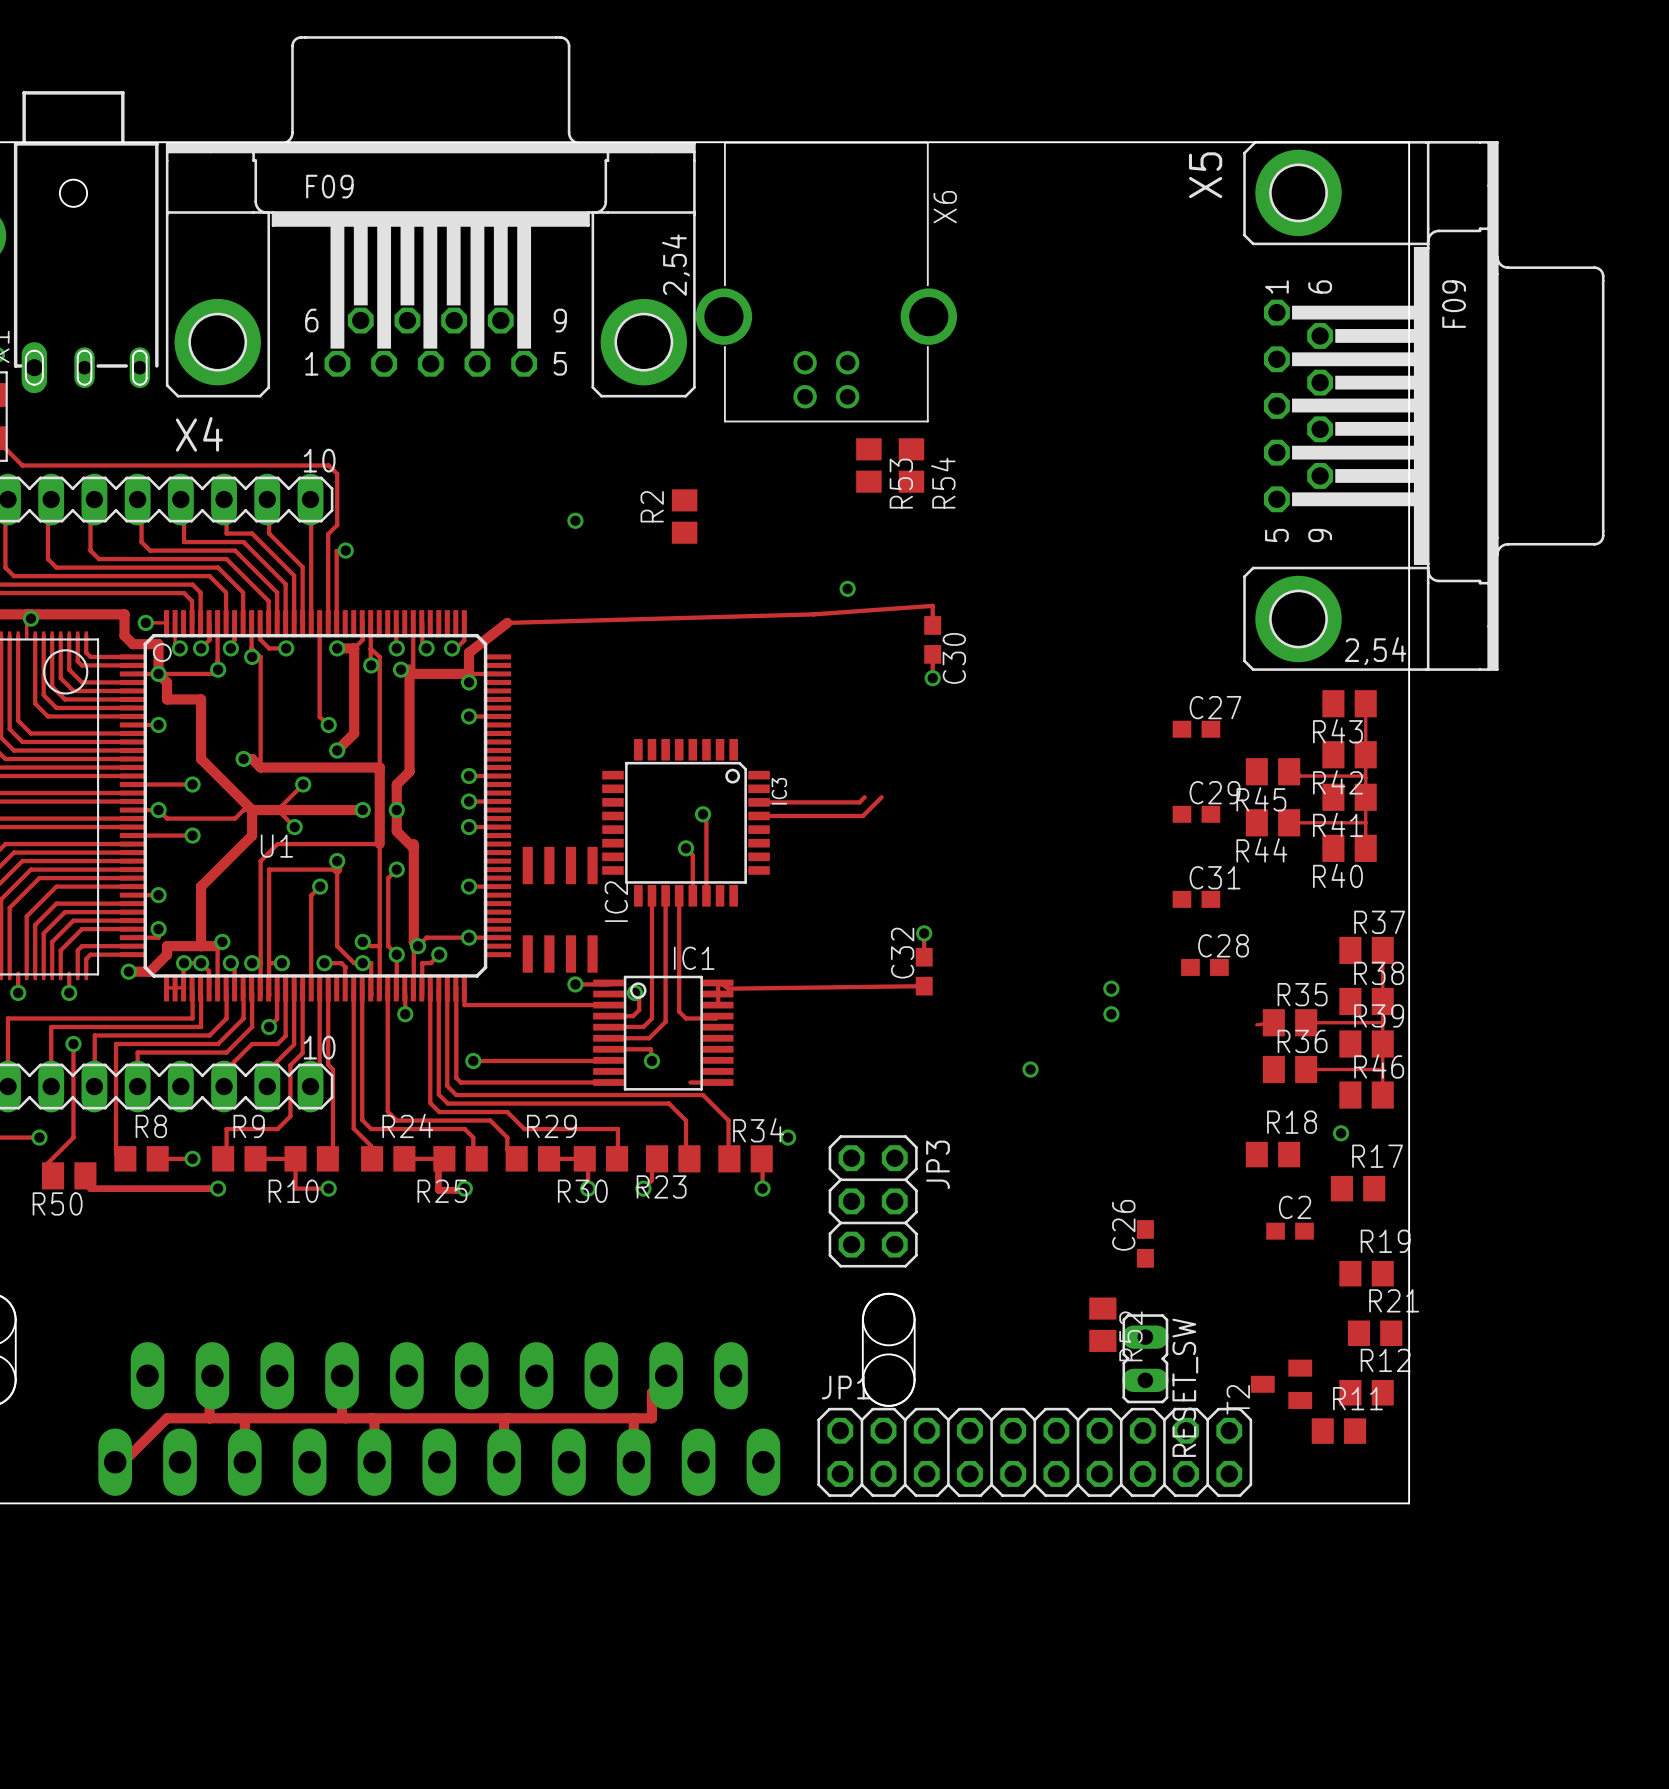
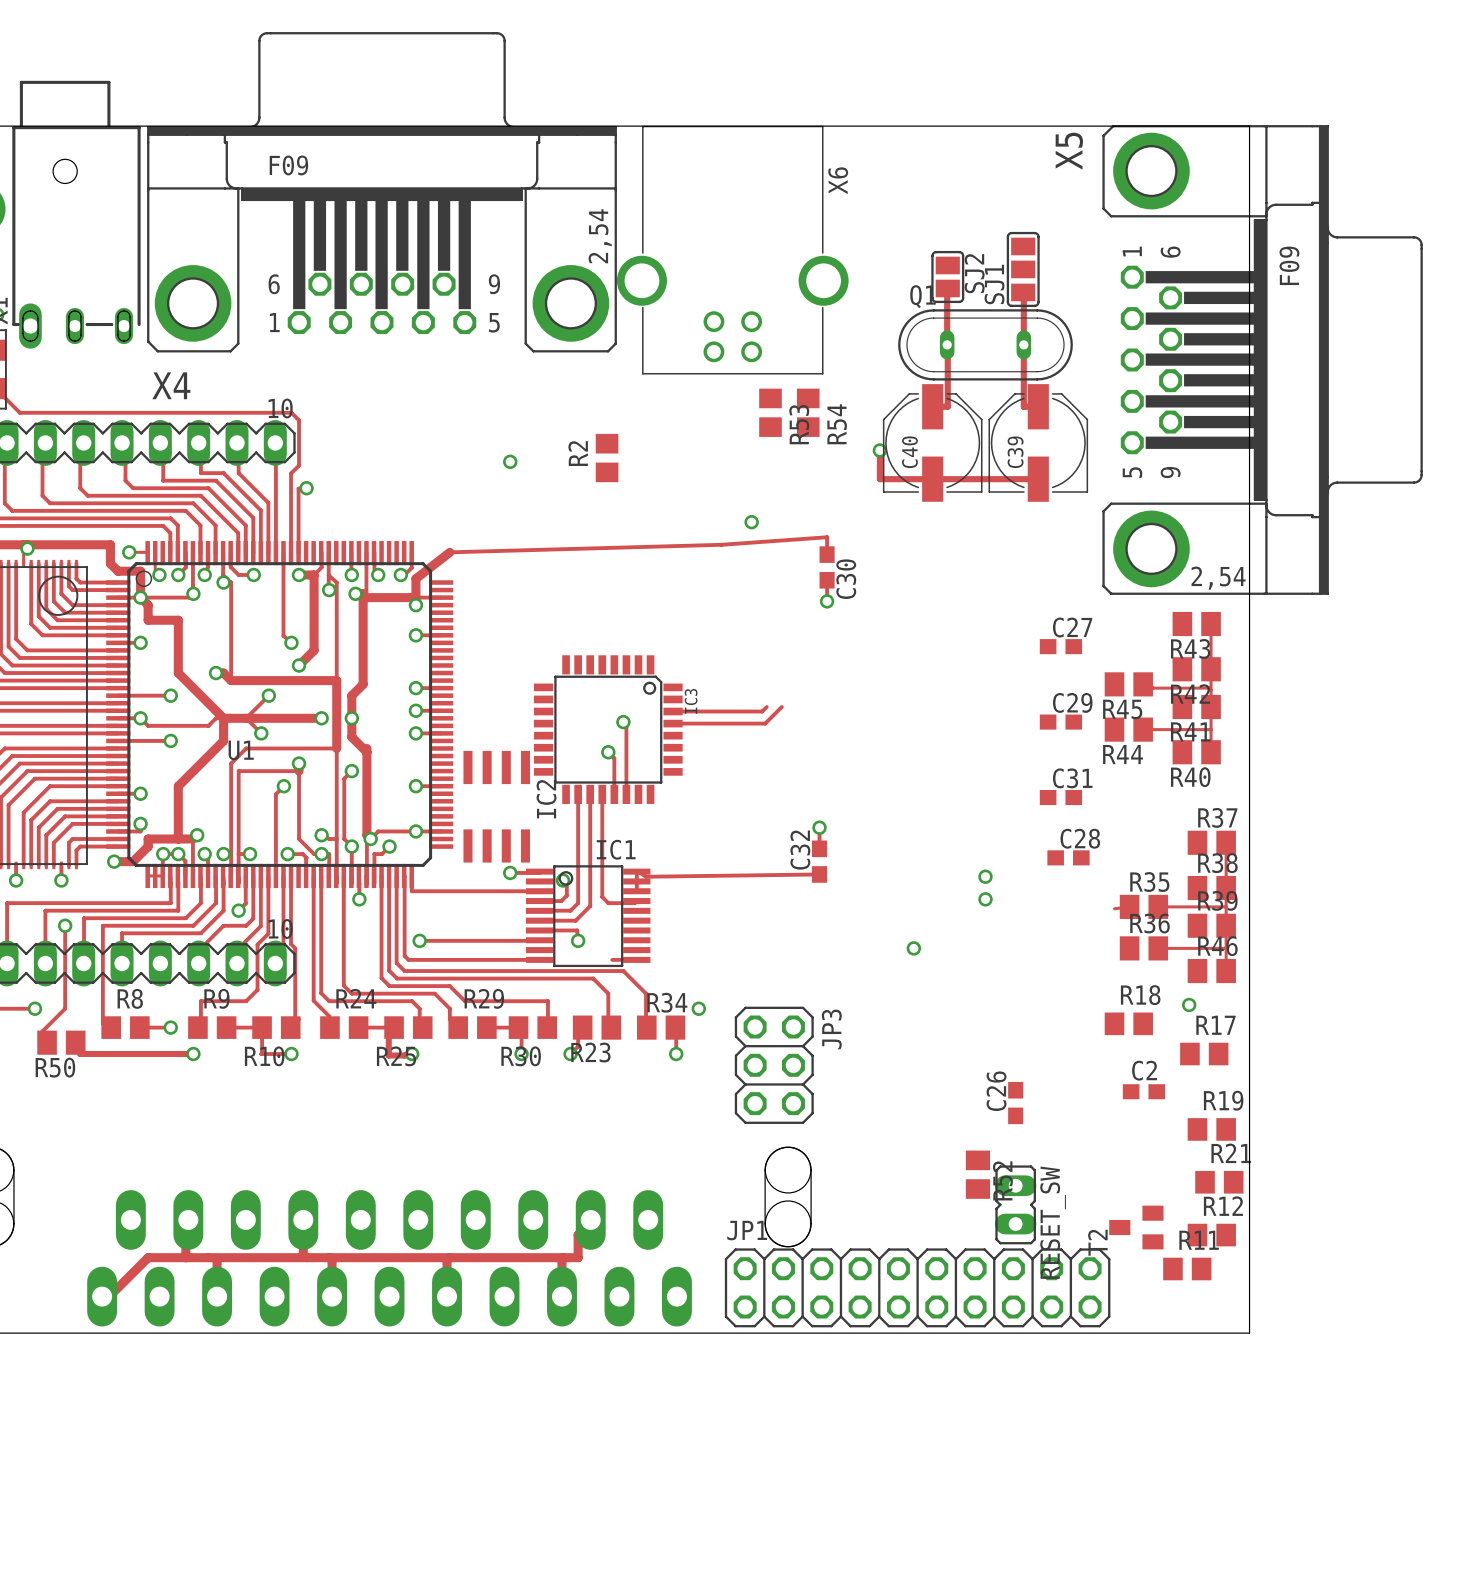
SJ1: none -> (1023, 269)
SJ2: none -> (947, 277)
track: none -> (947, 288) (947, 344)
track: none -> (1023, 292) (1023, 406) (1038, 406)
track: none -> (947, 344) (947, 406) (932, 406)
Q1: none -> (985, 344)
C40: none -> (932, 442)
C39: none -> (1038, 442)
track: none -> (879, 450) (879, 479) (1038, 479) (1038, 480)
via: none -> (879, 450)

